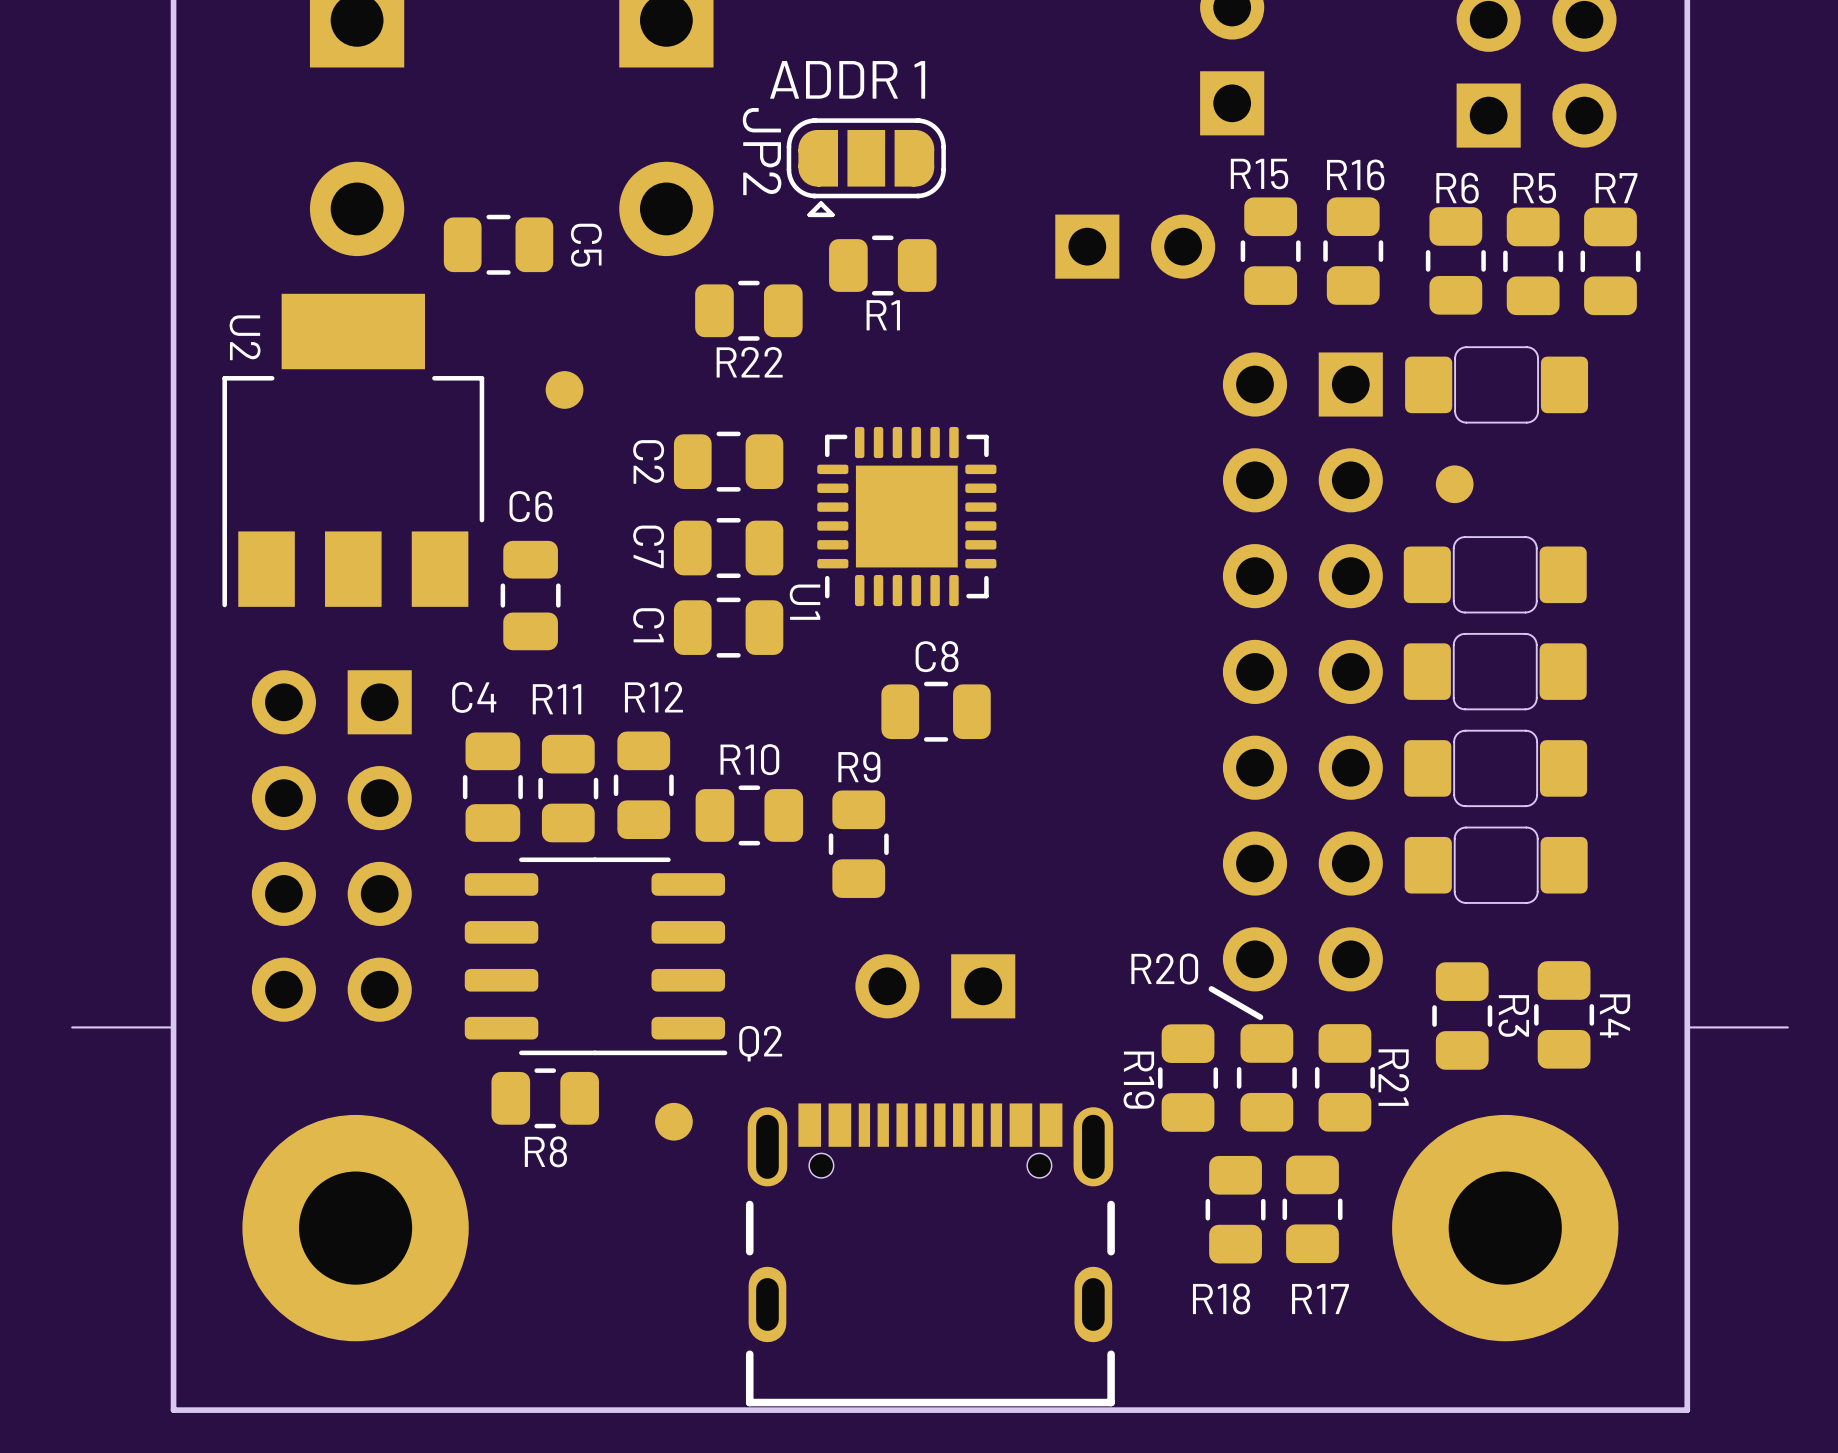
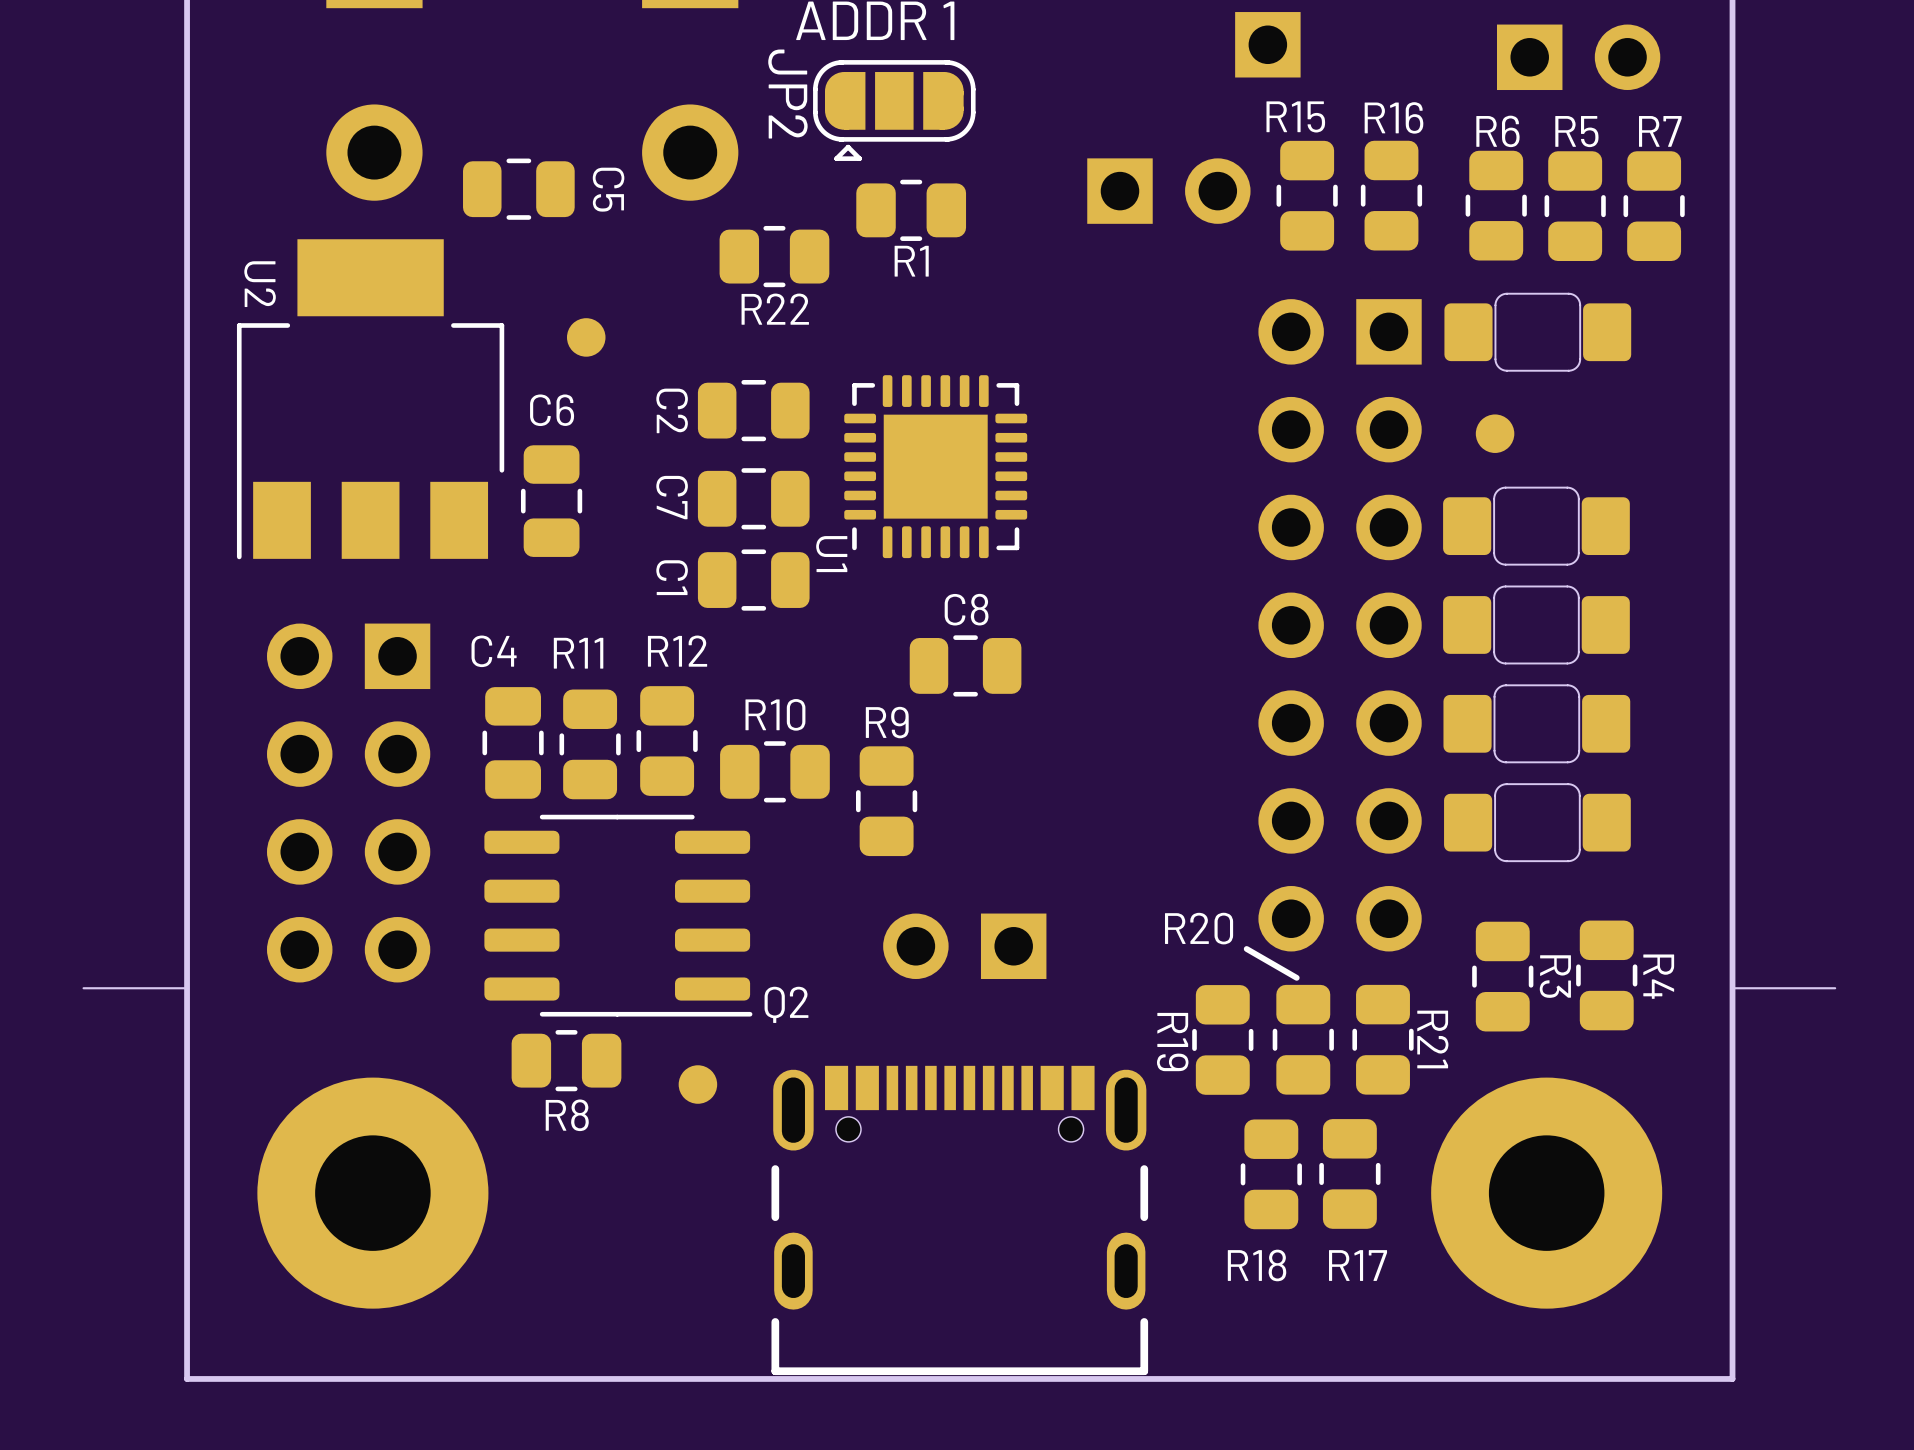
C6 position: (530, 595) -> (551, 501)

